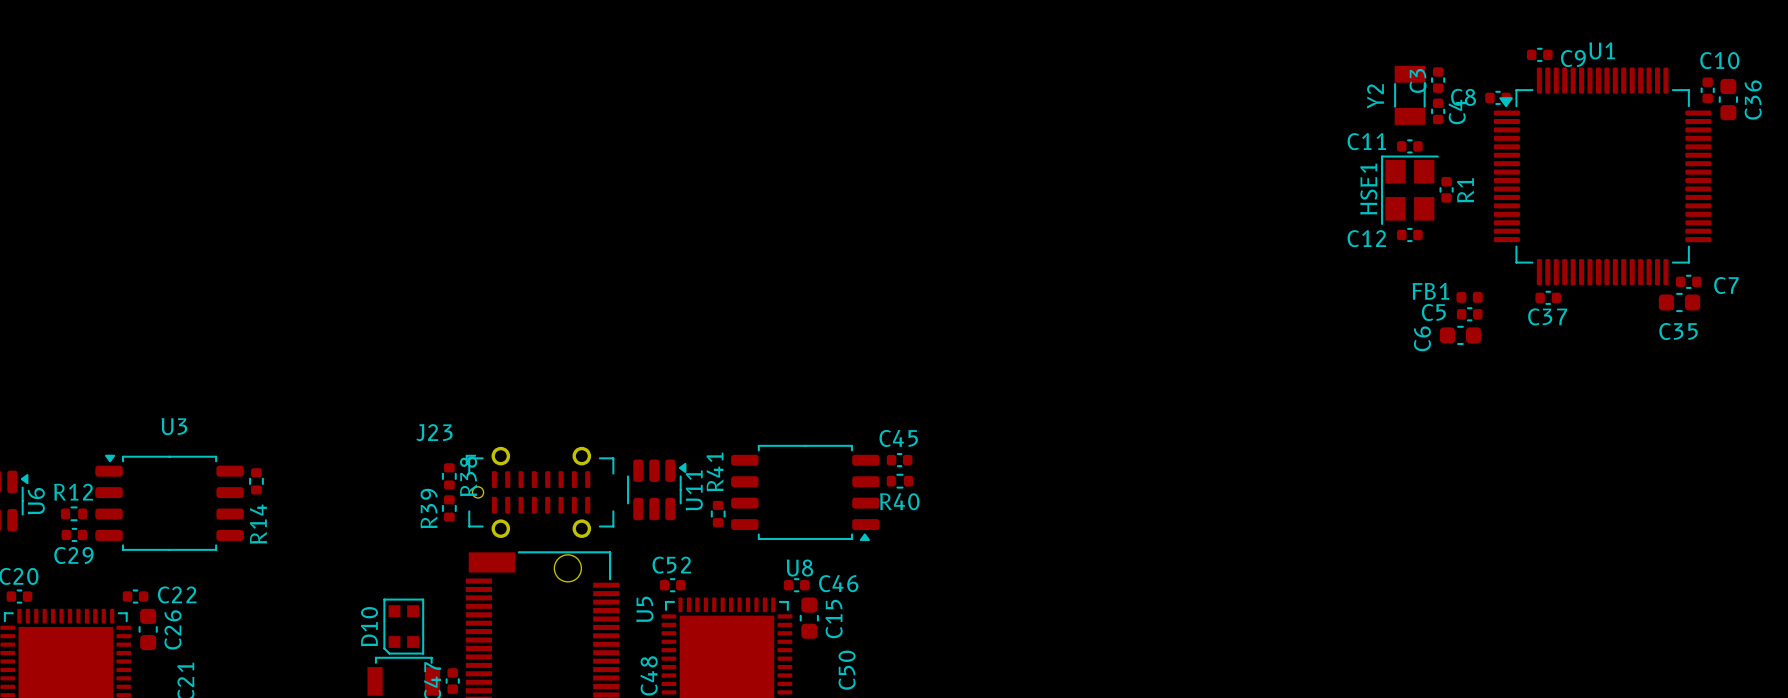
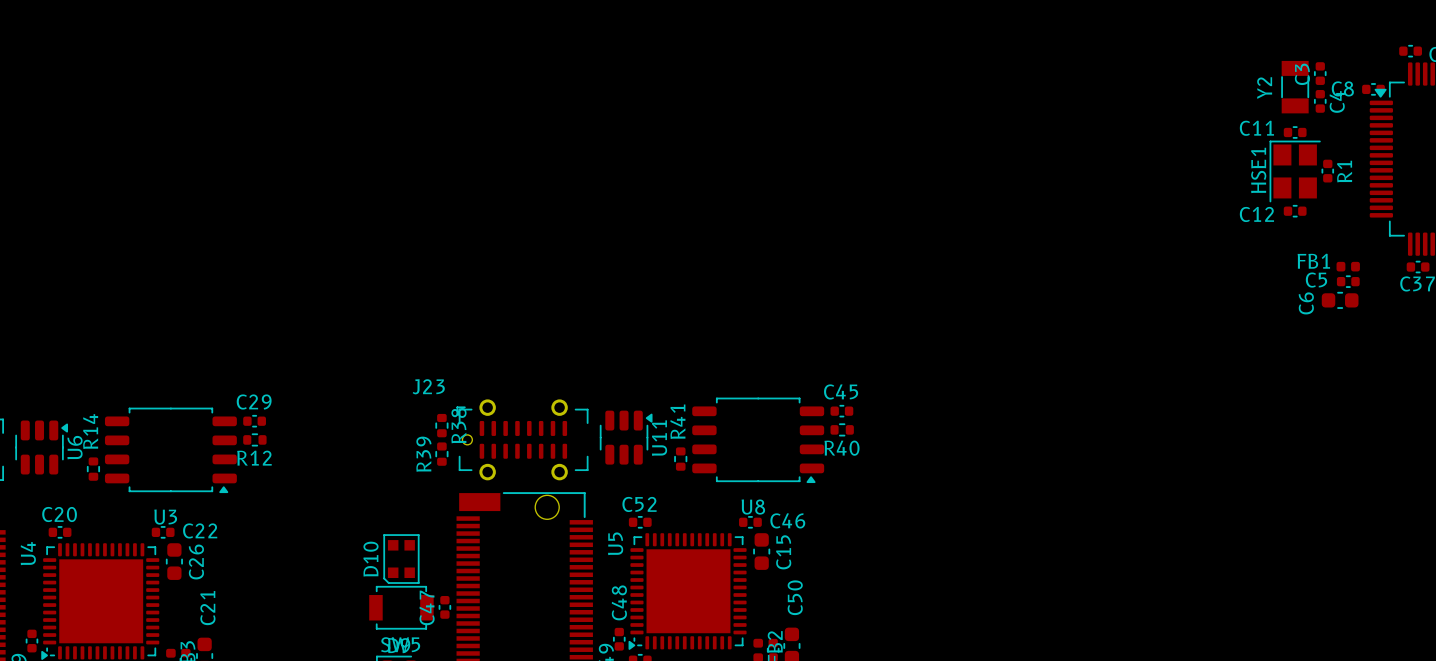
R14 position: (256, 481) -> (93, 469)
R12 name position: R12 (73, 492) -> R12 (254, 458)
U3 rotation: 0° (169, 502) -> 180° (170, 450)
R12 position: (74, 513) -> (254, 439)
R14 name position: R14 (258, 524) -> R14 (90, 431)
C29 position: (74, 534) -> (254, 421)
C29 name position: C29 (73, 555) -> C29 (254, 402)

